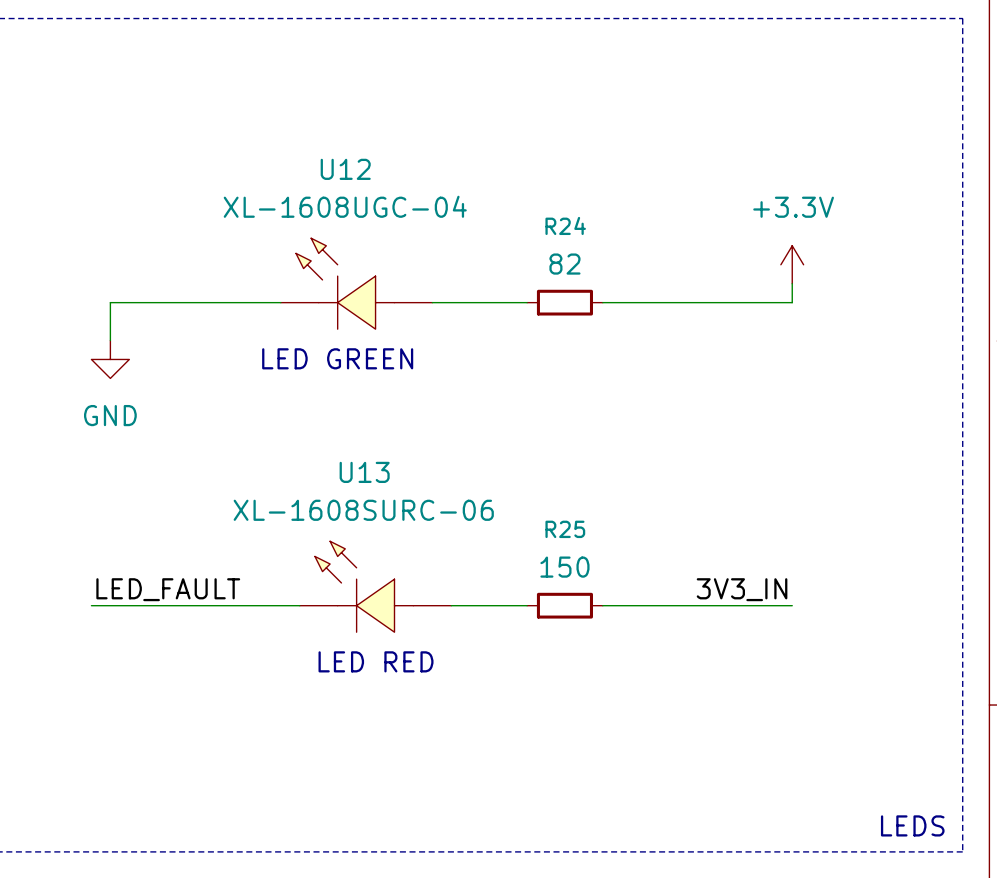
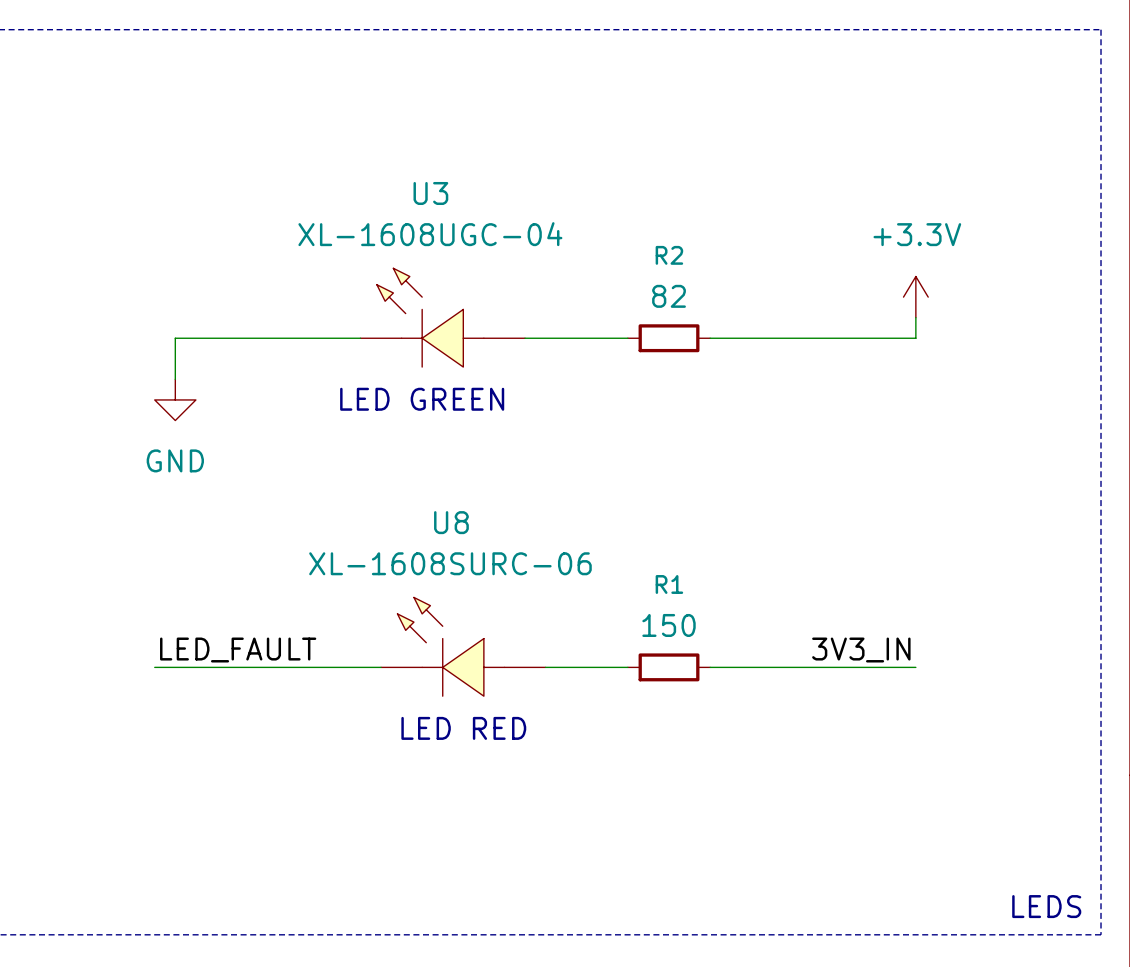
U12 name: U12 (345, 169) -> U3 (430, 193)
R24 name: R24 (565, 225) -> R2 (669, 255)
U13 name: U13 (364, 472) -> U8 (451, 522)
R25 name: R25 (565, 529) -> R1 (669, 584)

